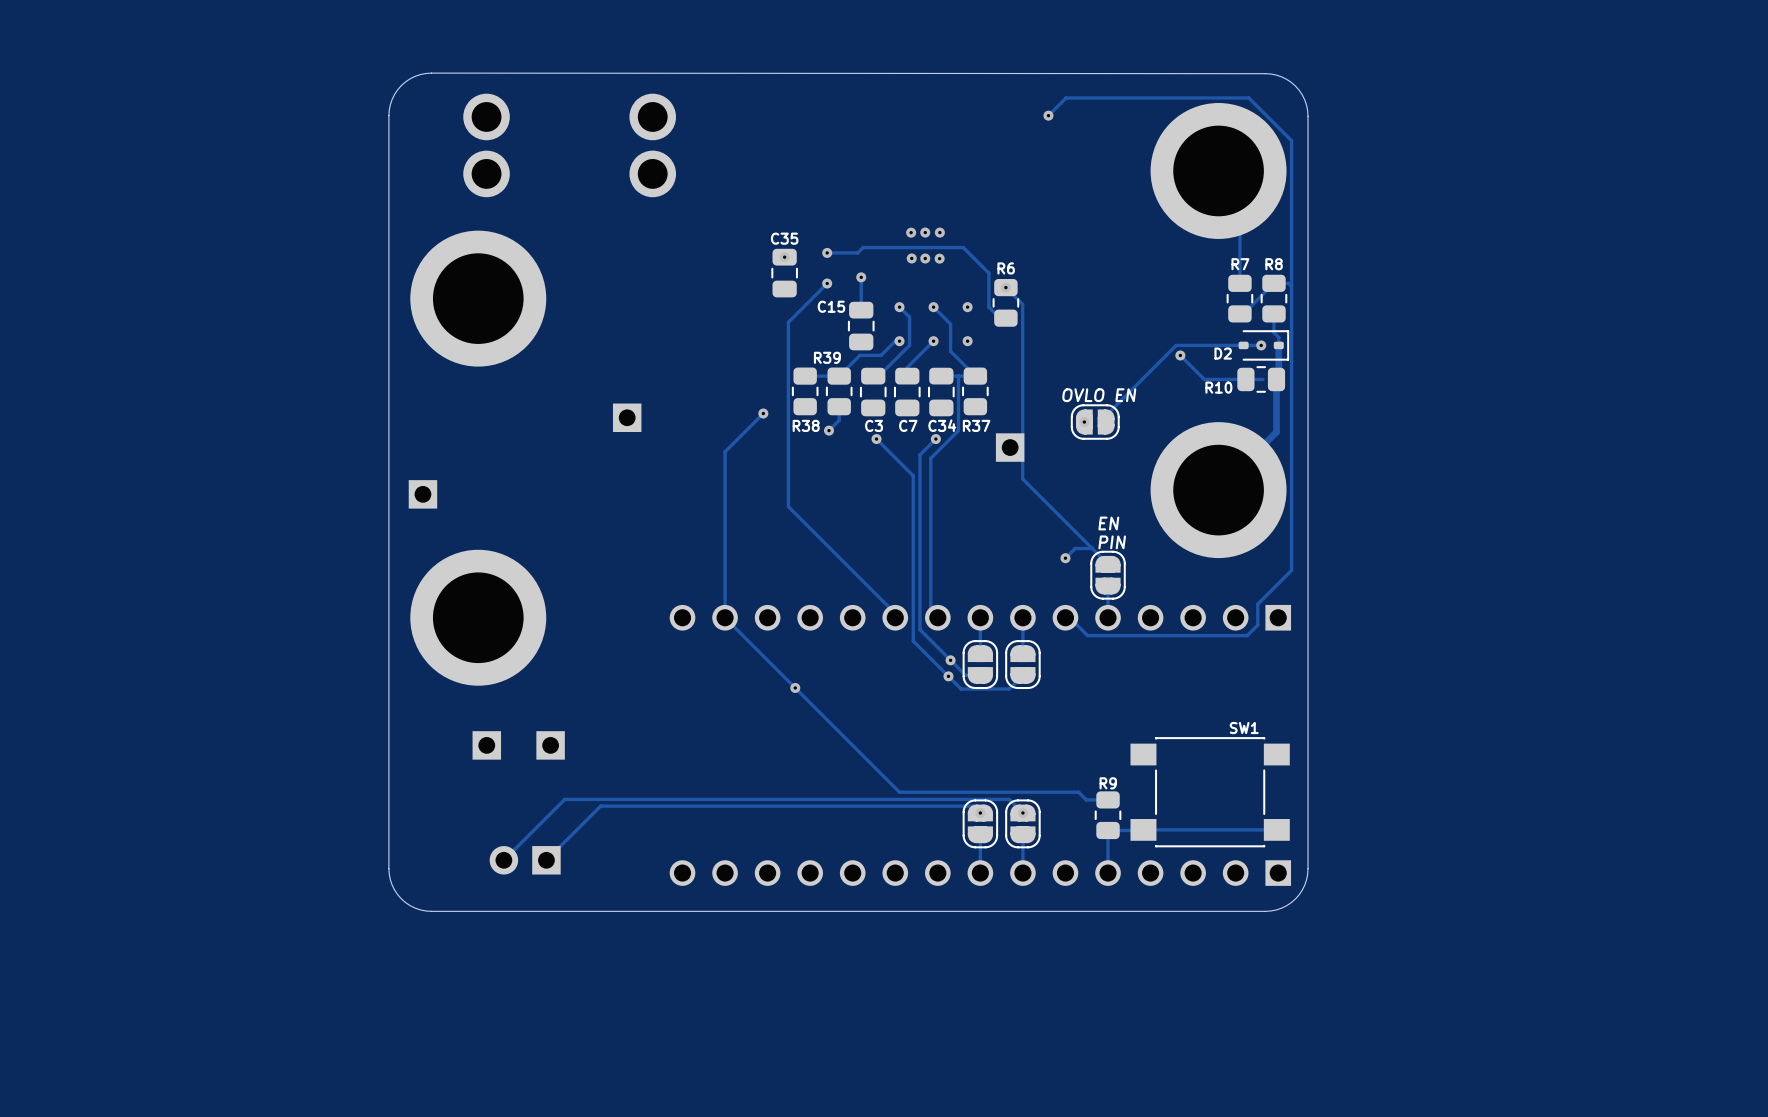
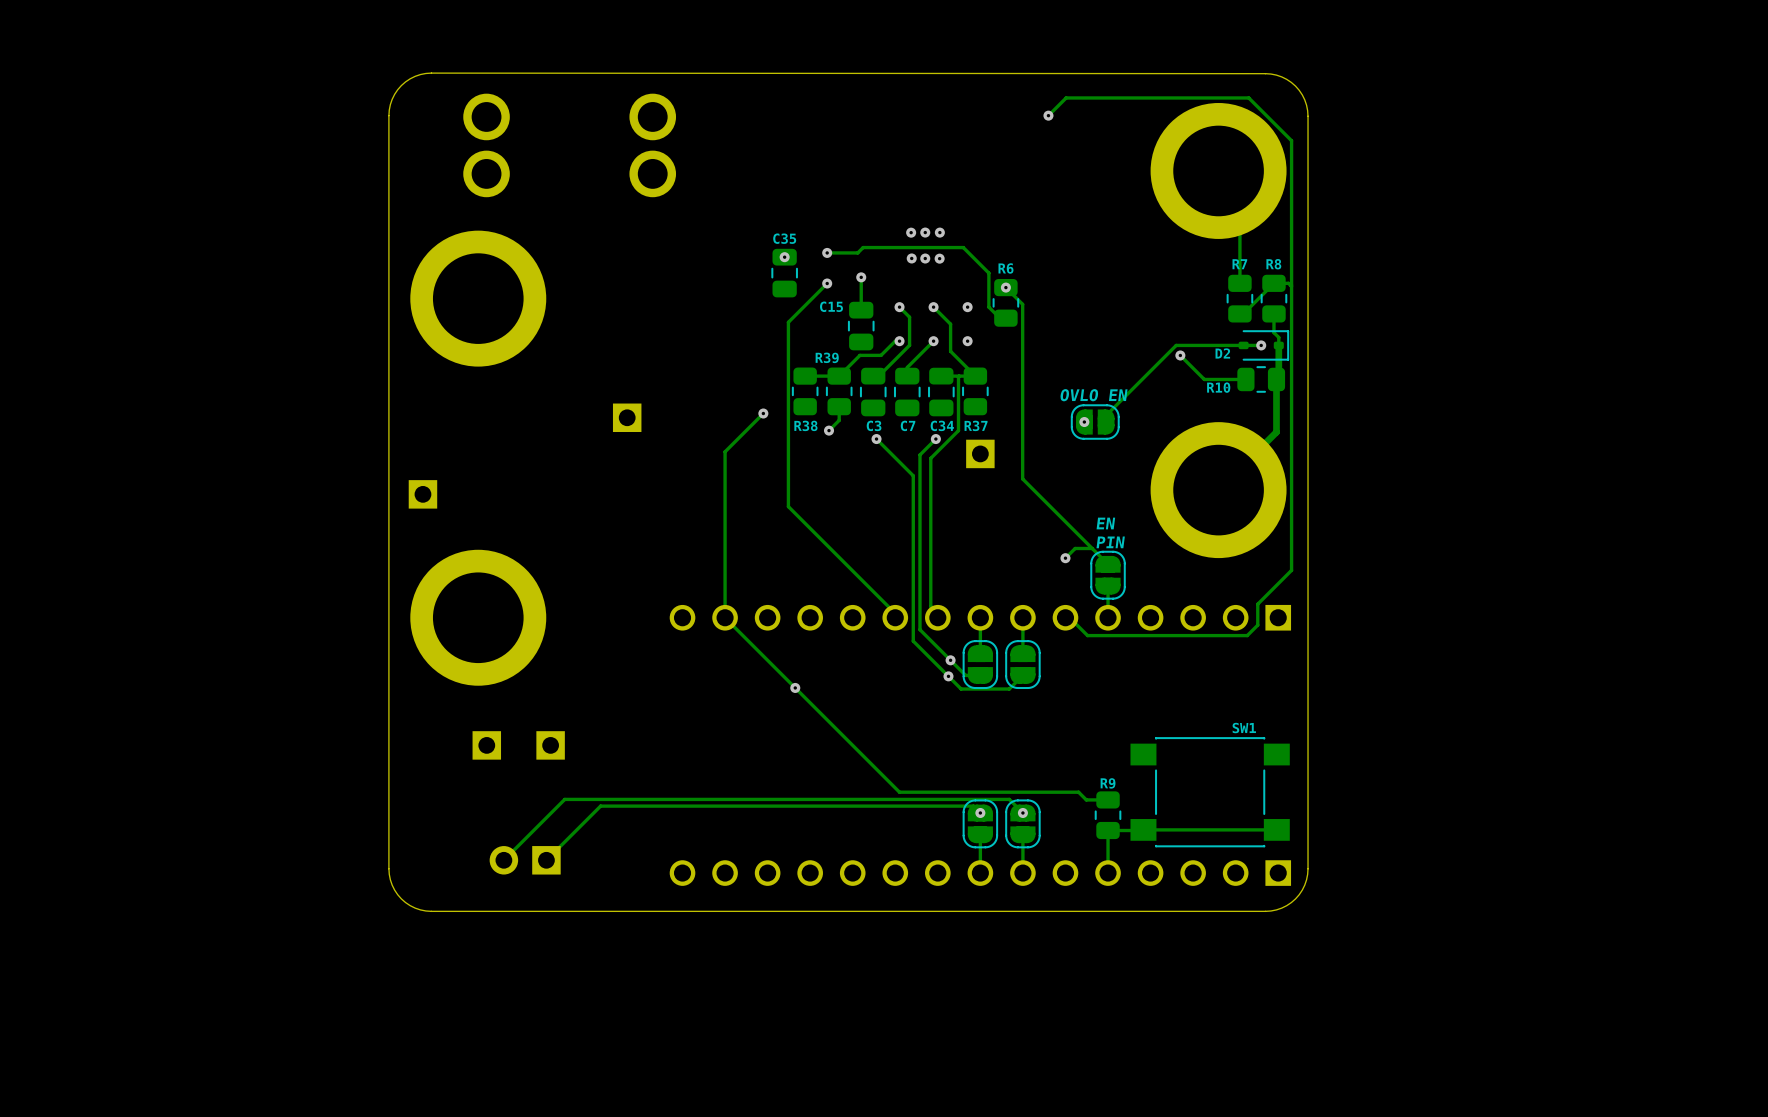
track: (1262, 379) (1245, 379) -> none
part position: (1010, 447) -> (980, 453)

